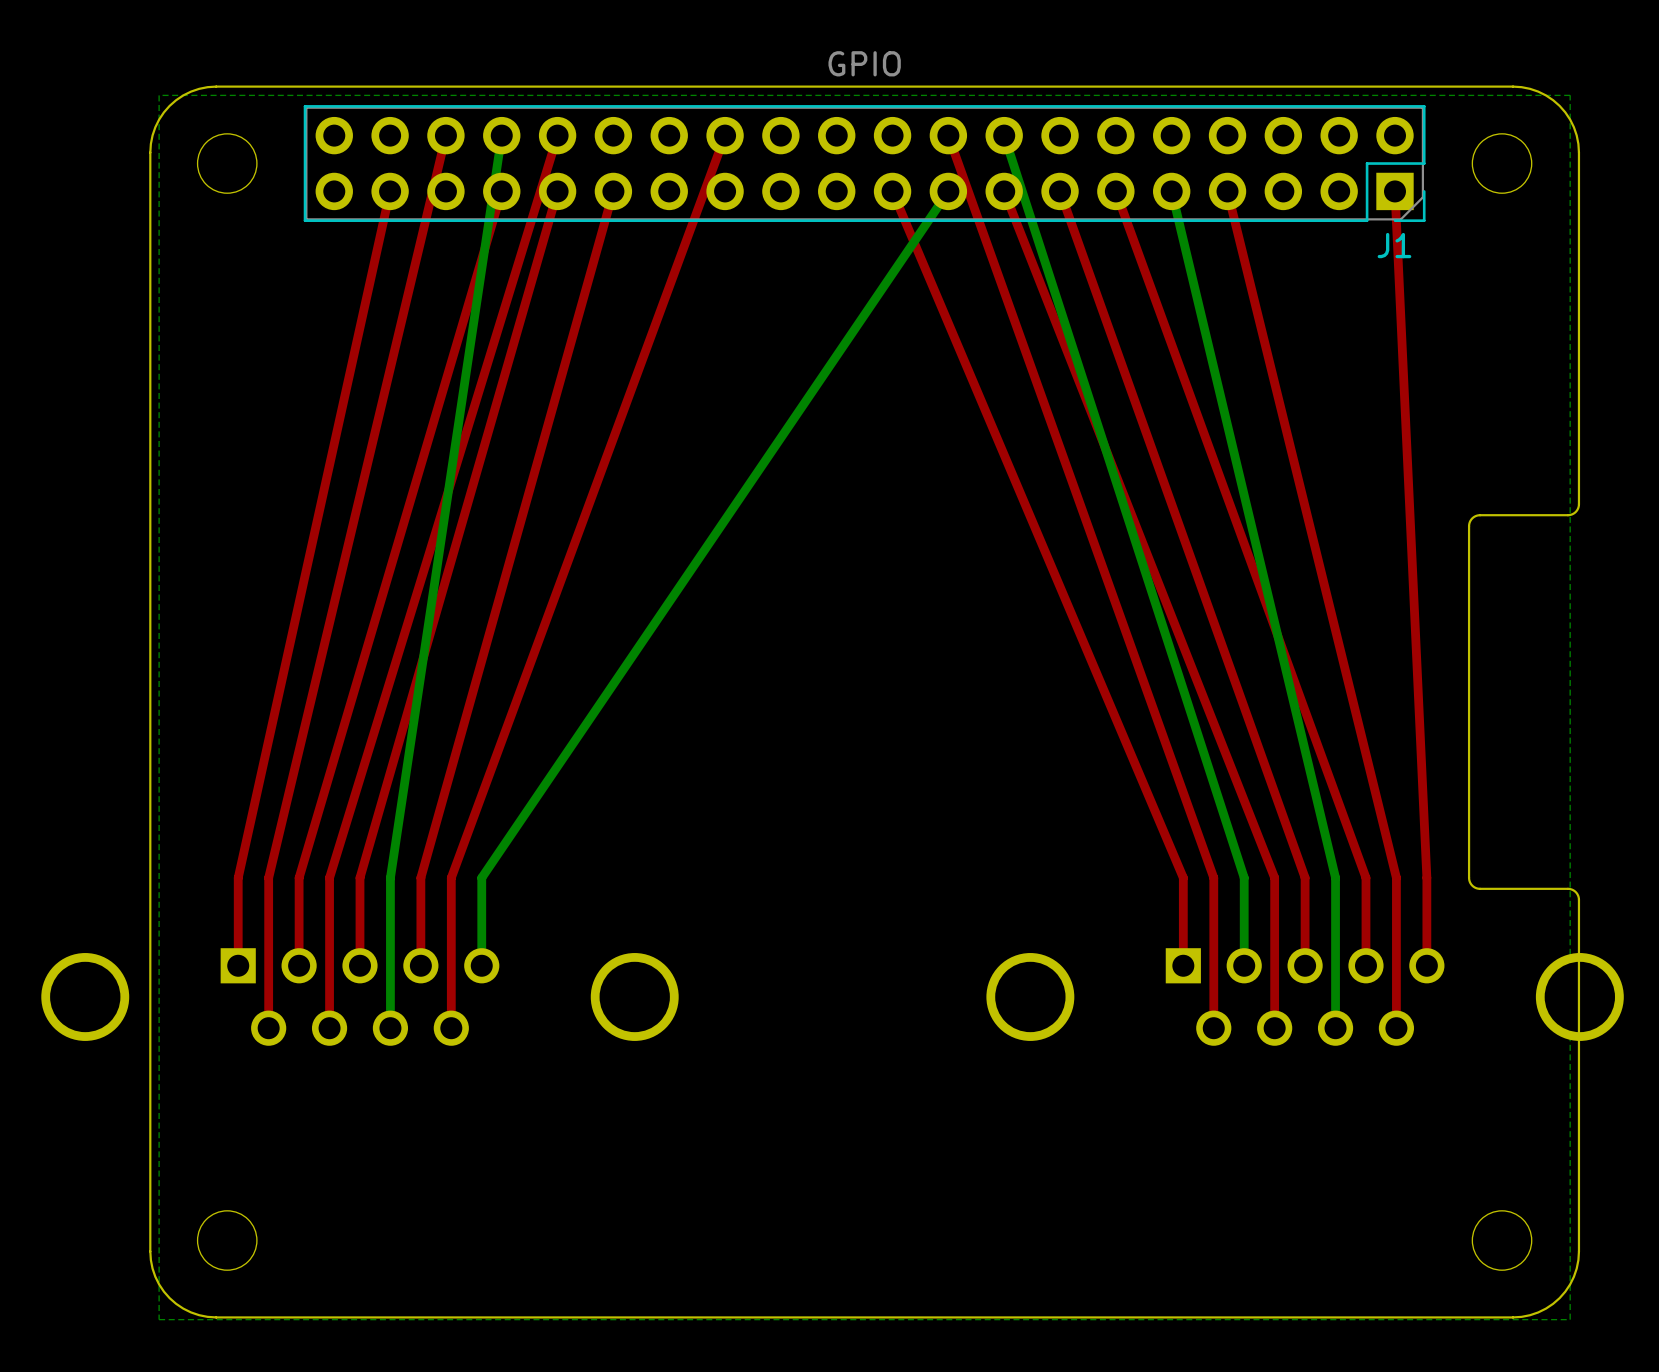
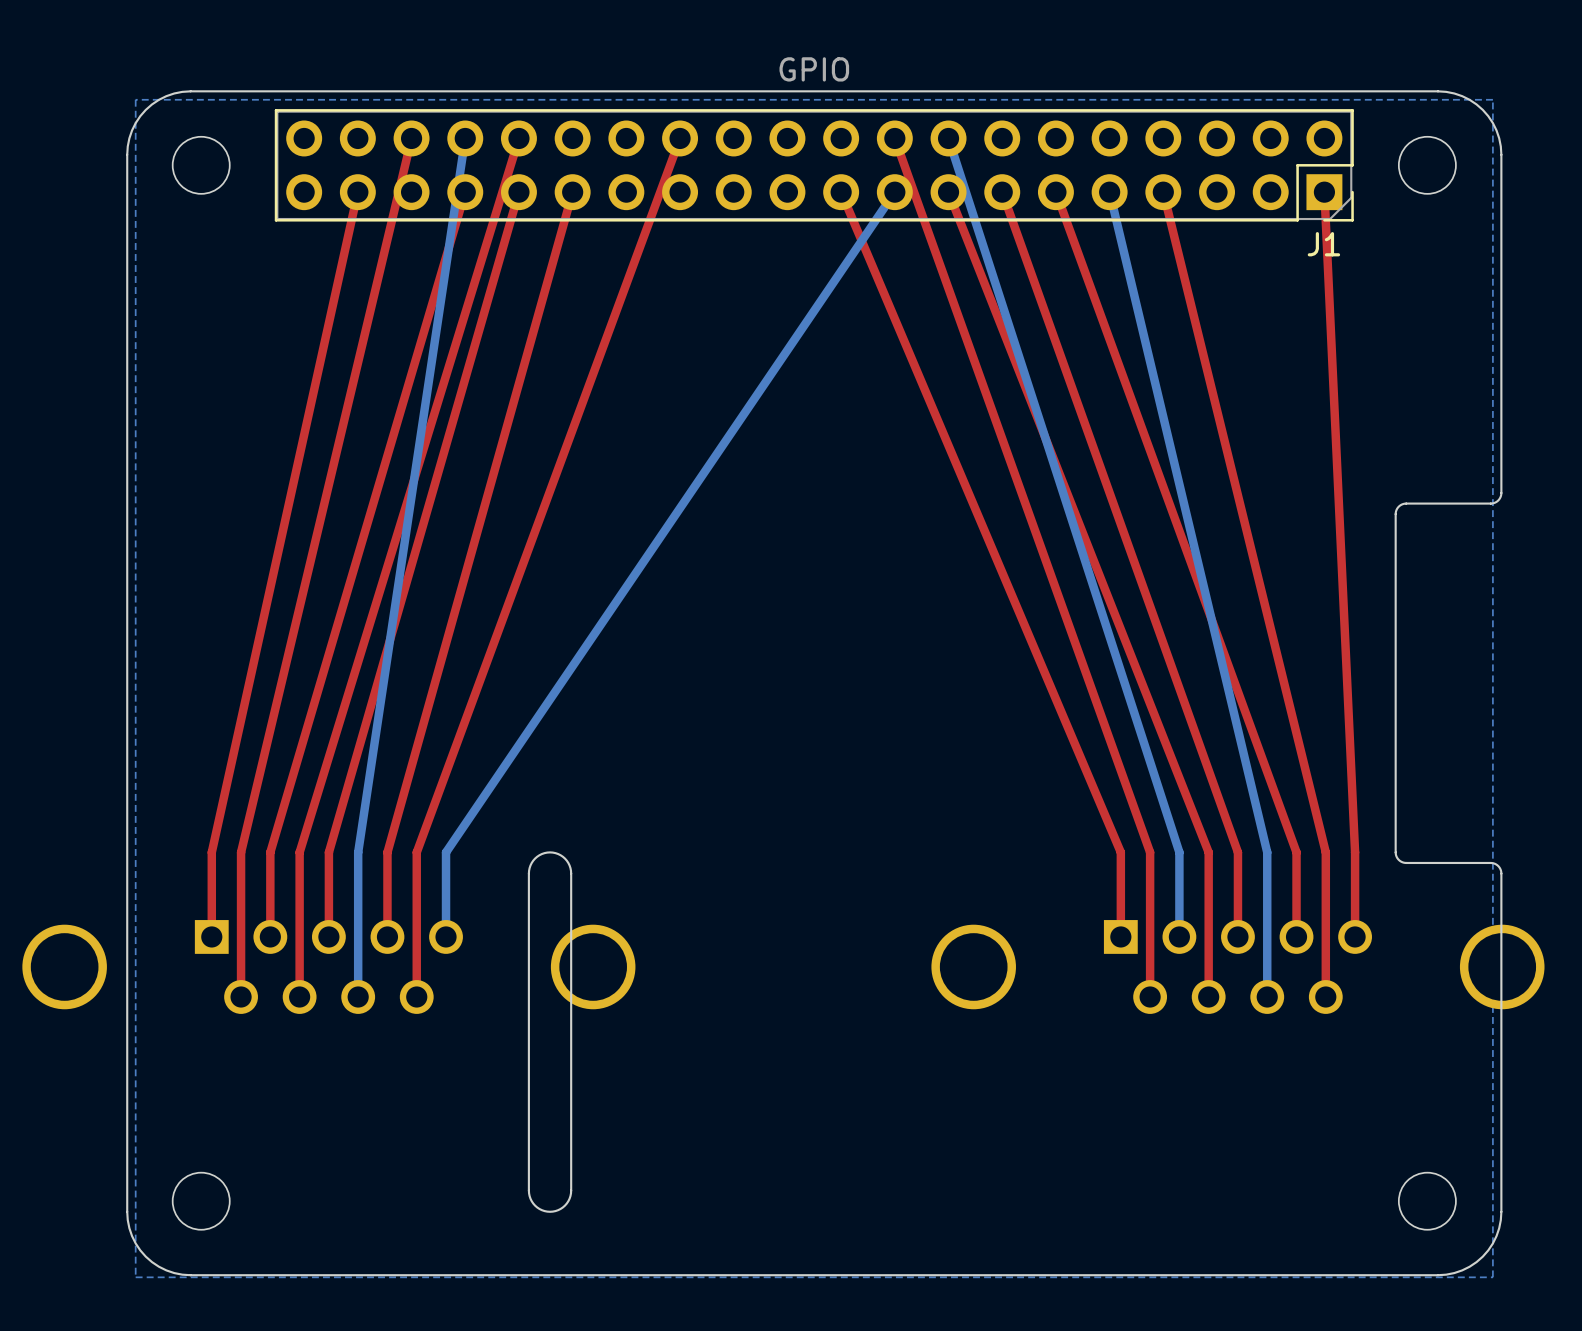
board edge: none -> (571, 873) (571, 1193) (568, 1201) (562, 1207) (555, 1211) (547, 1211) (539, 1208) (533, 1203) (528, 1190) (529, 870) (535, 858) (541, 854) (550, 852) (558, 854) (564, 858) (569, 865) (571, 873)

